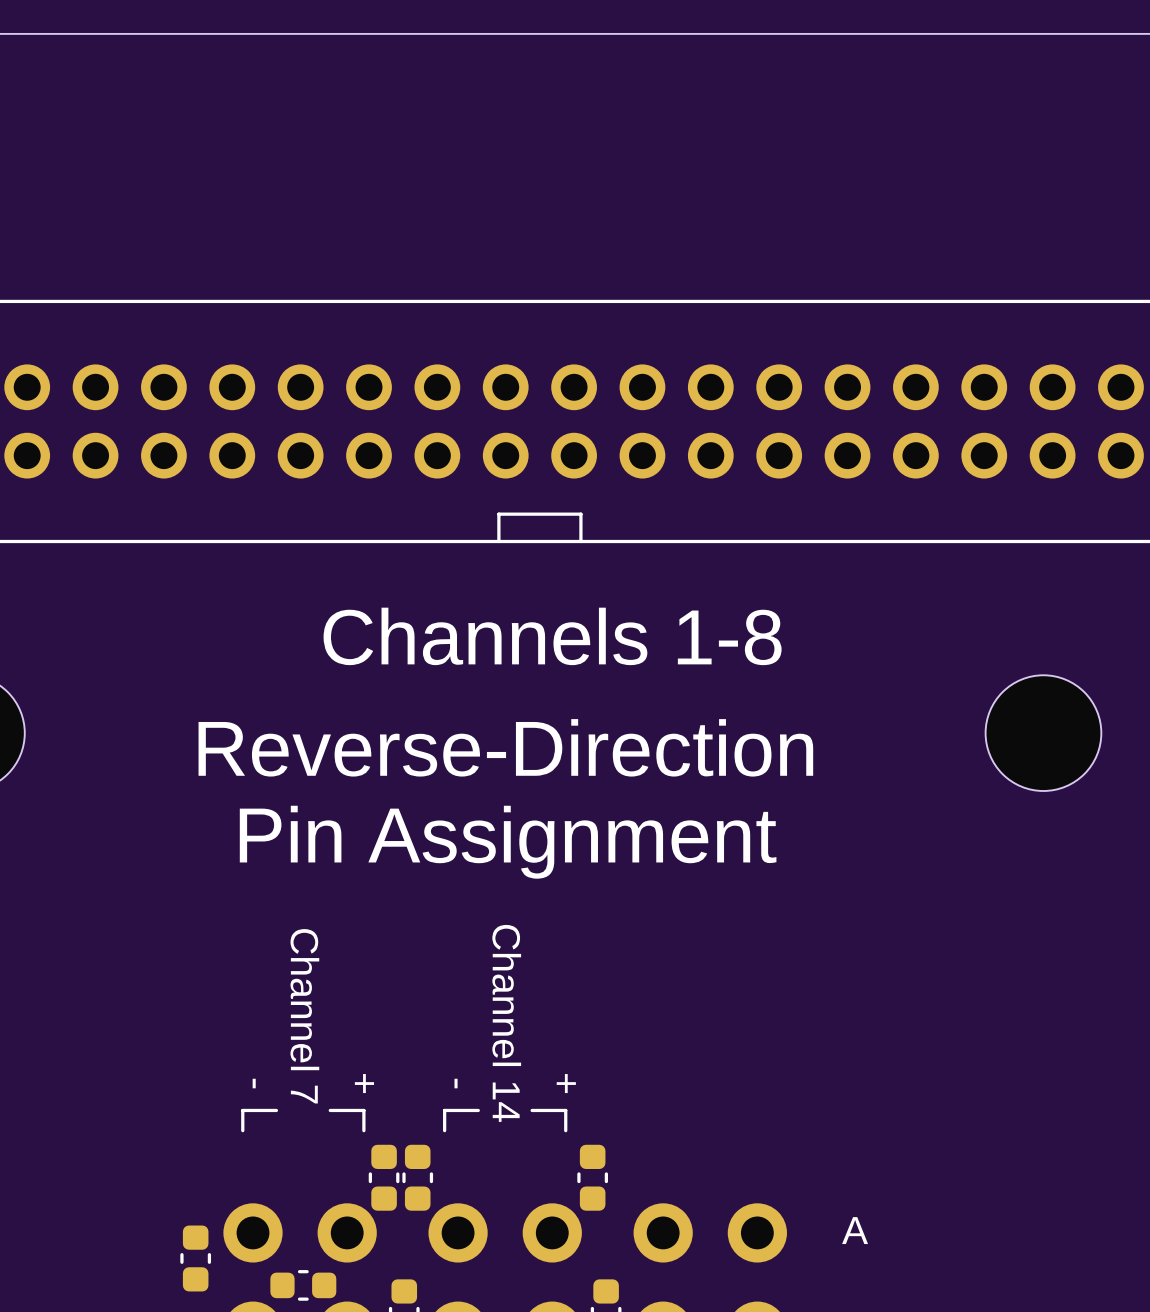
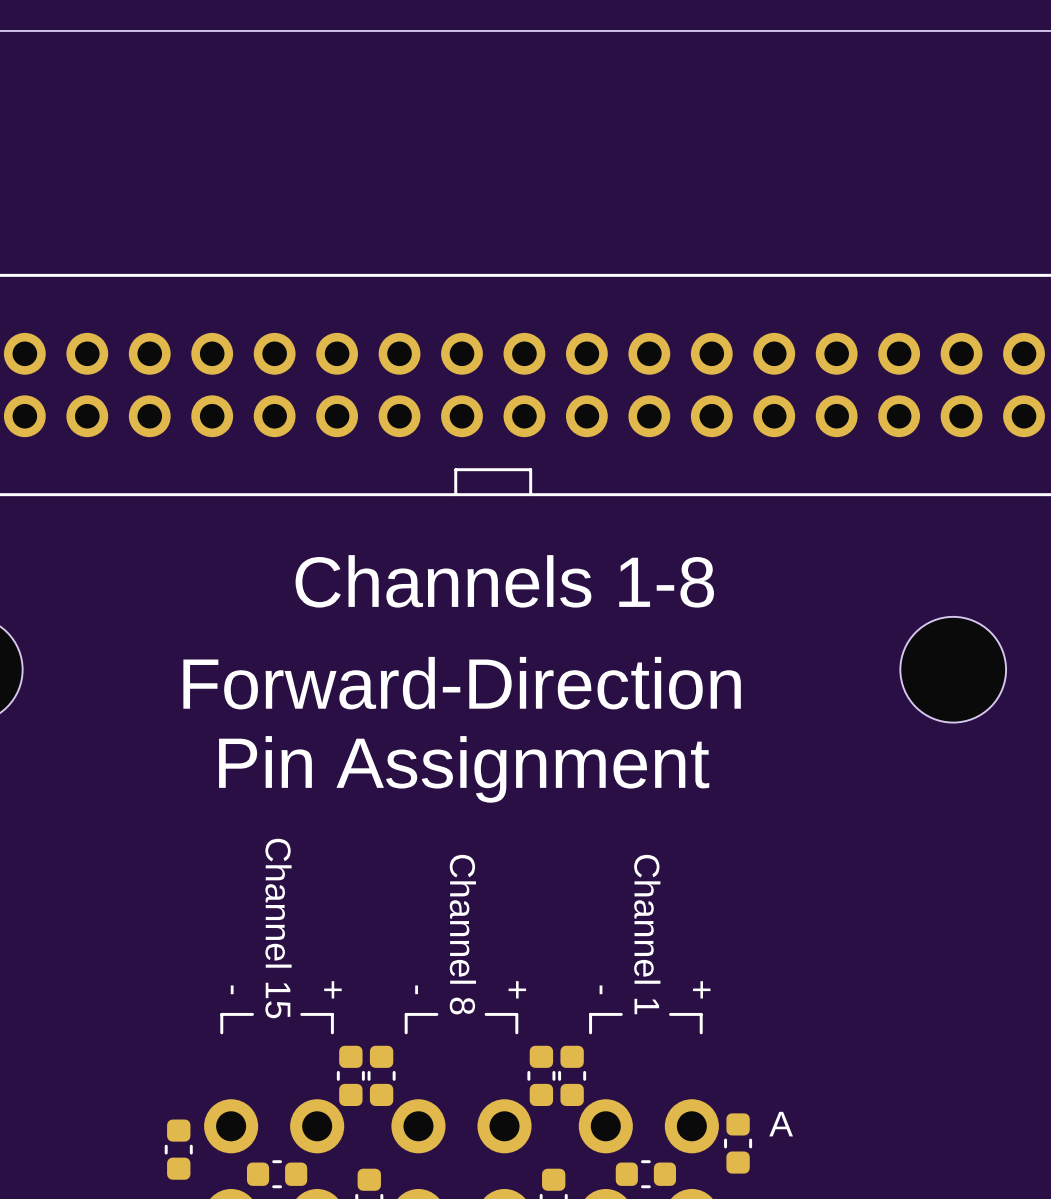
text: Reverse-Direction (505, 747) -> Forward-Direction (462, 683)
text: Channel 7 (304, 1016) -> Channel 15 (278, 928)
text: Channel 14 (506, 1023) -> Channel 8 (462, 934)
text: none -> Channel 1 (647, 934)
text: none -> - (600, 989)
text: none -> + (701, 989)
line: none -> (621, 1014) (590, 1014) (590, 1032)
line: none -> (670, 1014) (701, 1014) (701, 1032)
part: none -> (572, 1075)
part: none -> (738, 1143)
part: none -> (645, 1174)

